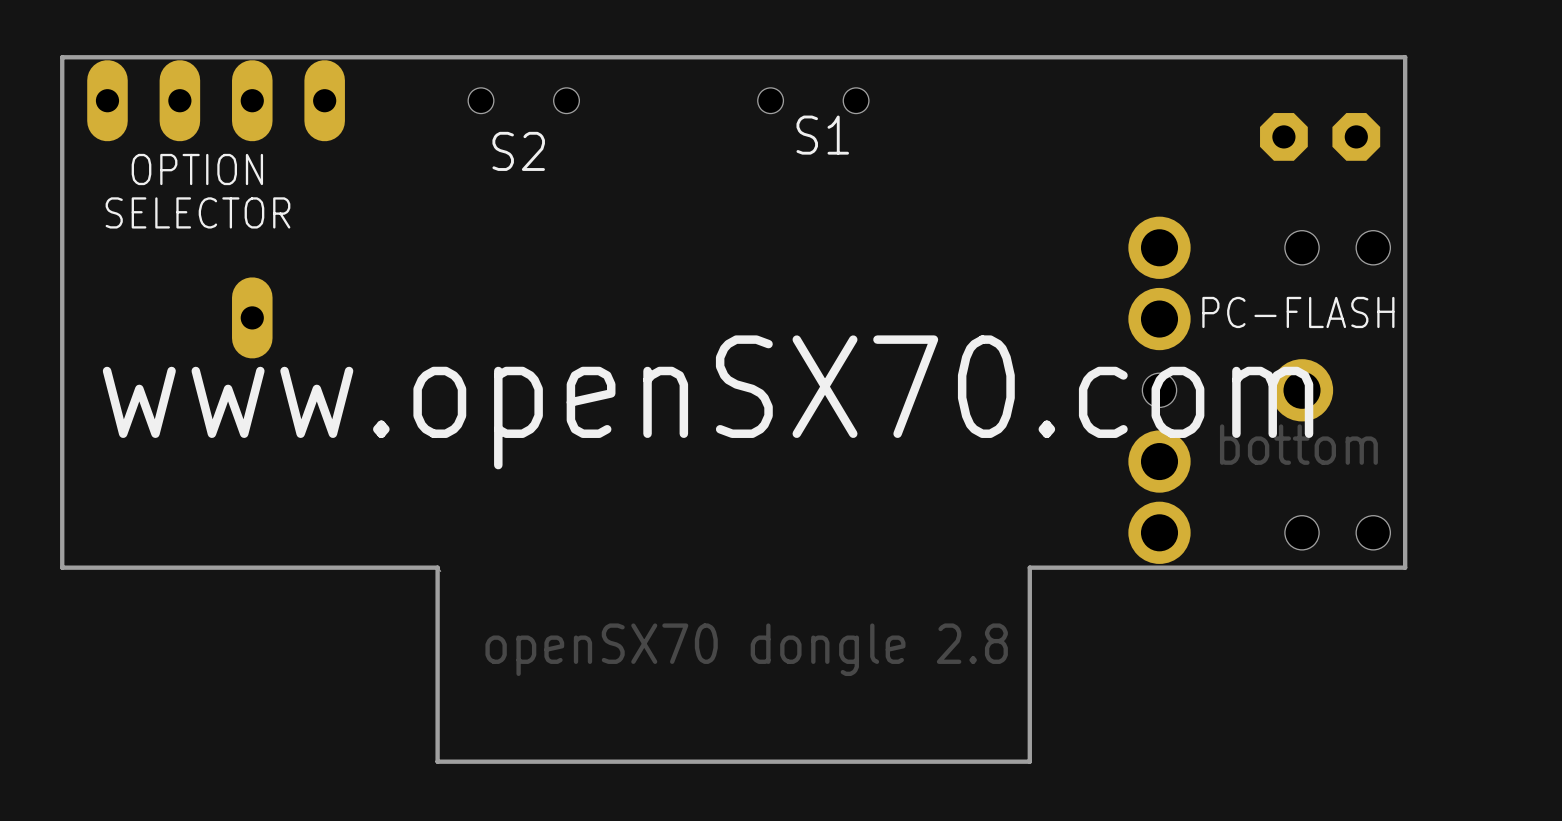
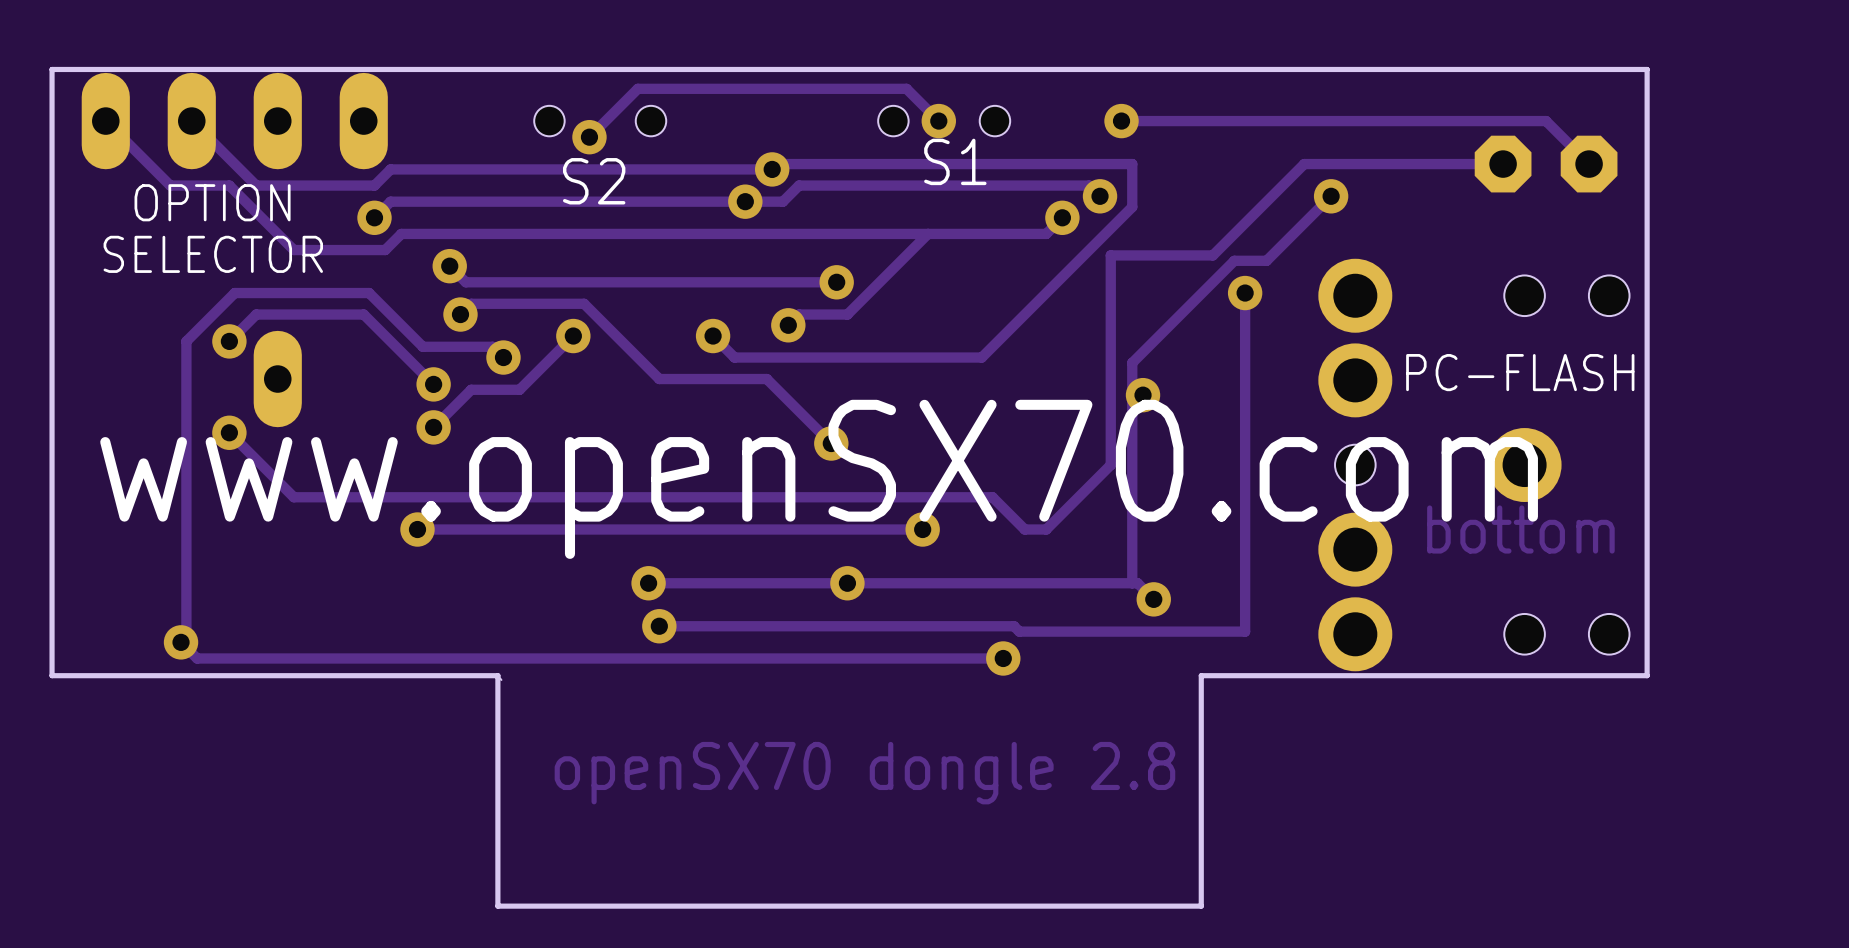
track: none -> (105, 121) (170, 185) (229, 185) (293, 250) (385, 250) (401, 233) (1046, 233) (1062, 217)
track: none -> (191, 121) (256, 185) (374, 185) (390, 169) (772, 169) (777, 164) (1132, 164) (1132, 207) (981, 357) (734, 357) (713, 336)
track: none -> (938, 121) (906, 88) (637, 88) (589, 137)
via: none -> (938, 121)
track: none -> (1121, 121) (1546, 121) (1589, 164)
via: none -> (1121, 121)
via: none -> (589, 137)
track: none -> (1503, 164) (1304, 164) (1212, 255) (1110, 255) (1110, 465) (1046, 529) (1024, 529) (992, 497) (293, 497) (229, 432)
via: none -> (772, 169)
track: none -> (1100, 196) (1089, 185) (799, 185) (782, 201) (390, 201) (374, 217)
via: none -> (1100, 196)
track: none -> (1331, 196) (1266, 260) (1234, 260) (1132, 362) (1132, 583)
via: none -> (1331, 196)
via: none -> (745, 201)
via: none -> (374, 217)
via: none -> (1062, 217)
track: none -> (928, 233) (847, 314) (799, 314) (788, 325)
track: none -> (449, 266) (465, 282) (836, 282)
via: none -> (449, 266)
via: none -> (836, 282)
track: none -> (1245, 293) (1245, 631) (1019, 631) (1014, 626) (659, 626)
via: none -> (1245, 293)
track: none -> (460, 314) (471, 303) (584, 303) (659, 379) (766, 379) (831, 443)
via: none -> (460, 314)
via: none -> (788, 325)
track: none -> (573, 336) (519, 389) (471, 389) (433, 427)
via: none -> (573, 336)
via: none -> (713, 336)
track: none -> (229, 341) (256, 314) (363, 314) (433, 384)
via: none -> (229, 341)
track: none -> (503, 357) (492, 346) (422, 346) (369, 293) (234, 293) (186, 341) (186, 642) (181, 642) (197, 658) (1003, 658)
via: none -> (503, 357)
via: none -> (433, 384)
via: none -> (1143, 395)
via: none -> (433, 427)
via: none -> (229, 432)
via: none -> (831, 443)
via: none -> (417, 529)
track: none -> (922, 529) (417, 529)
via: none -> (922, 529)
track: none -> (648, 583) (1137, 583) (1153, 599)
via: none -> (648, 583)
via: none -> (847, 583)
via: none -> (1153, 599)
via: none -> (659, 626)
via: none -> (181, 642)
via: none -> (1003, 658)

